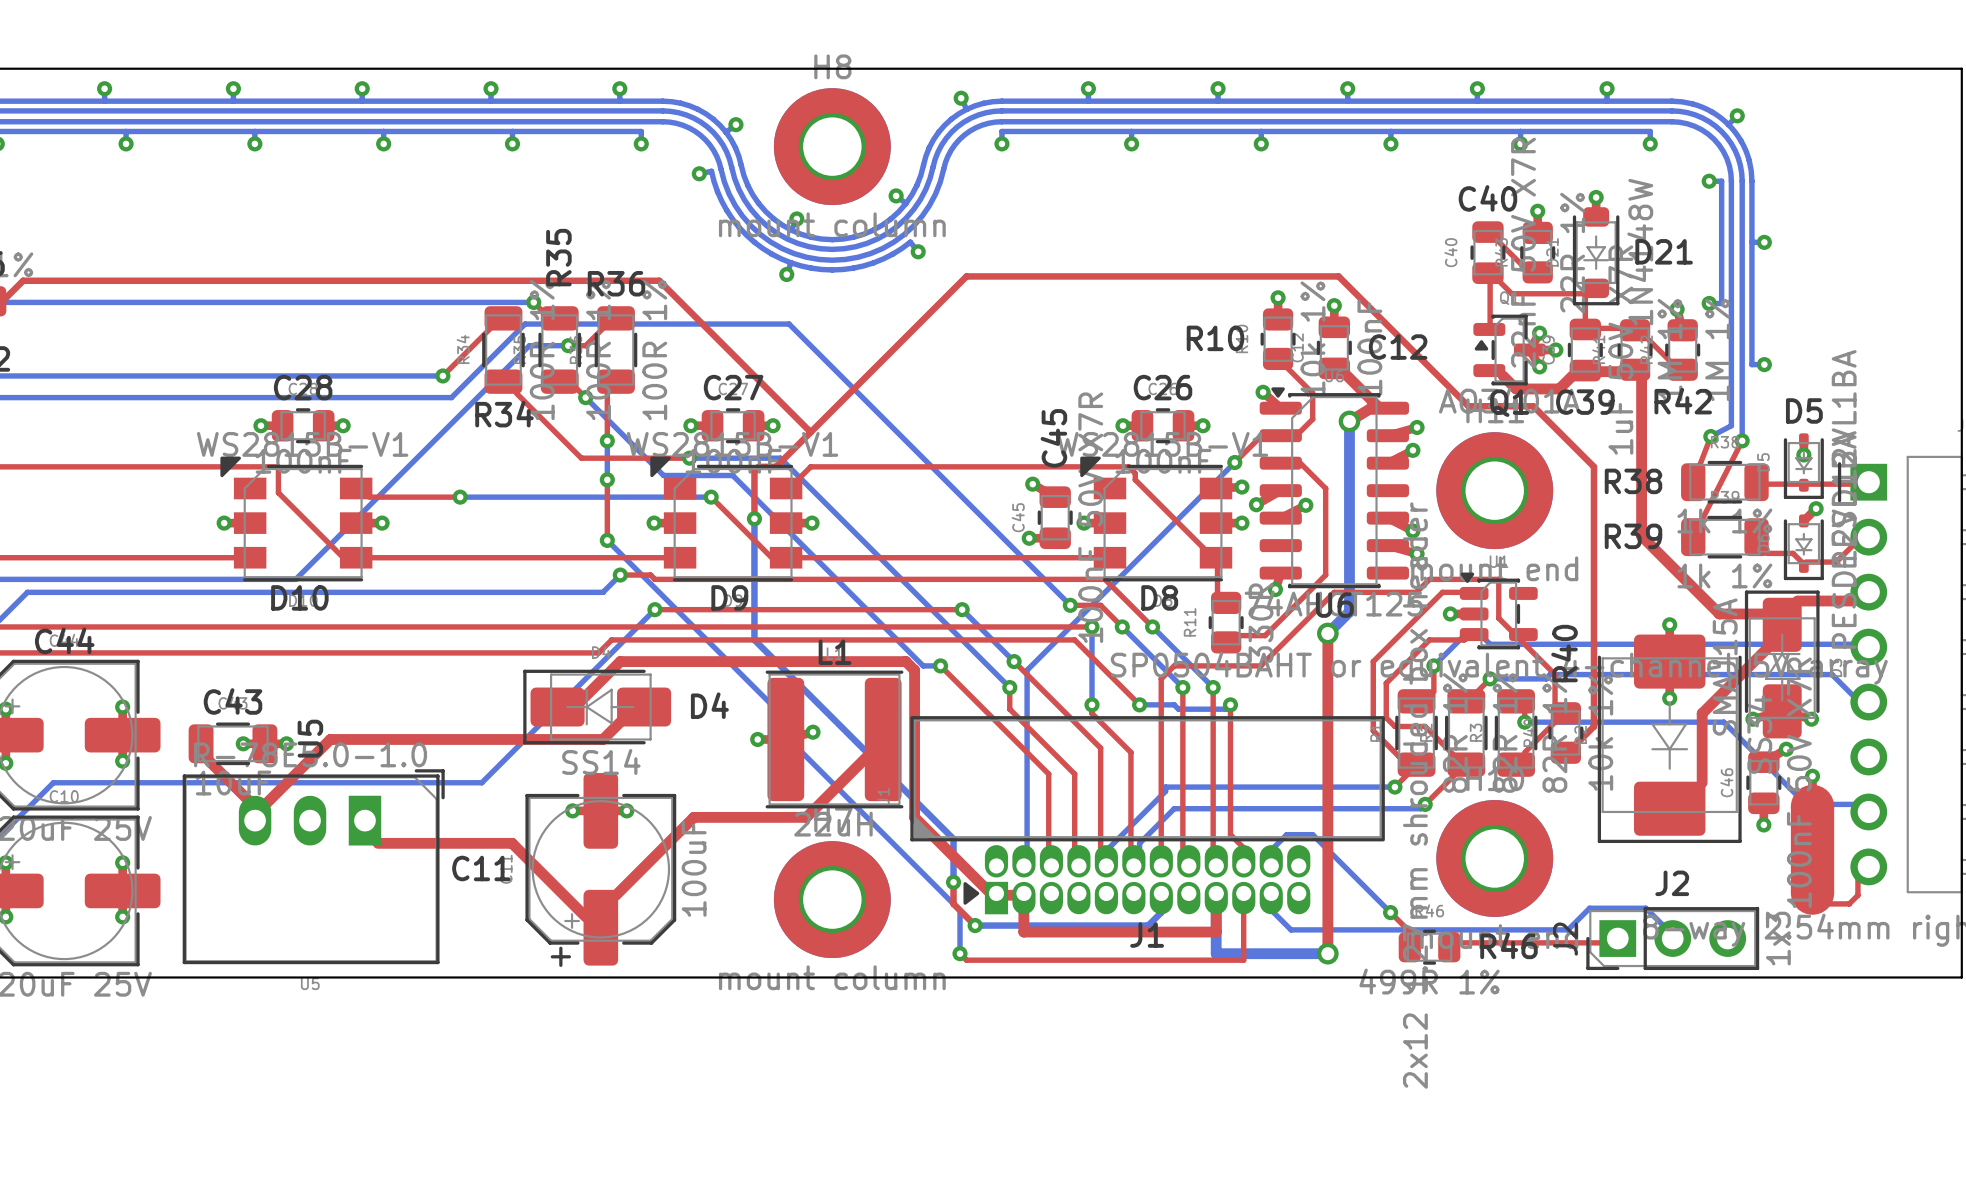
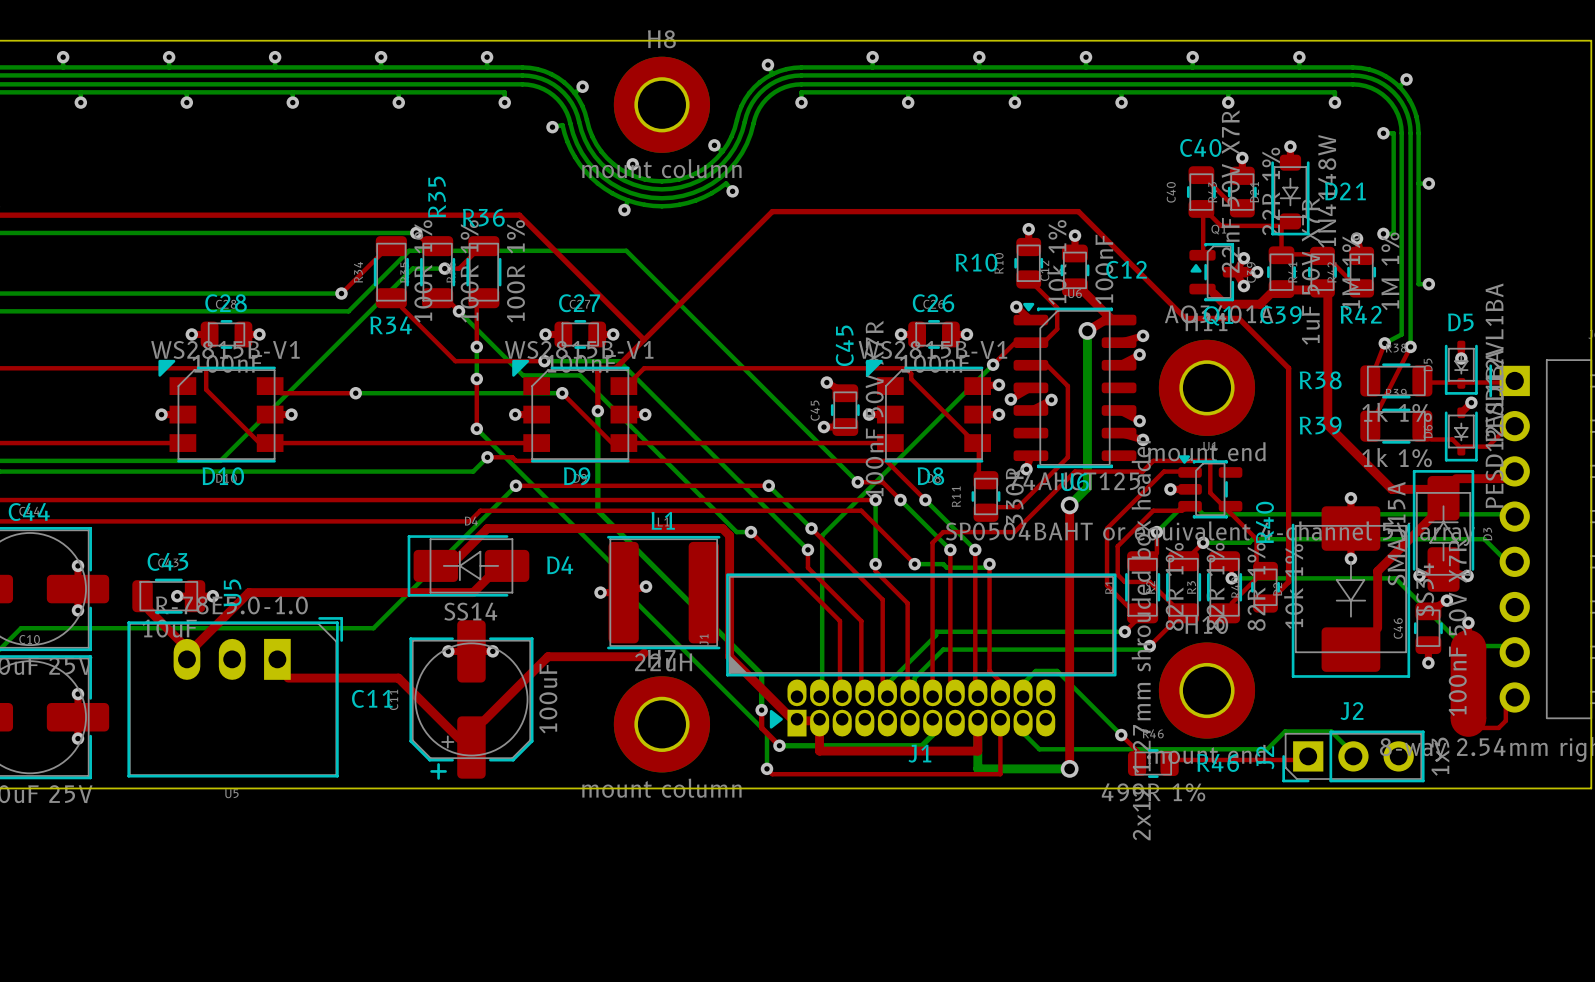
top track: (883, 740) (810, 813) -> none

